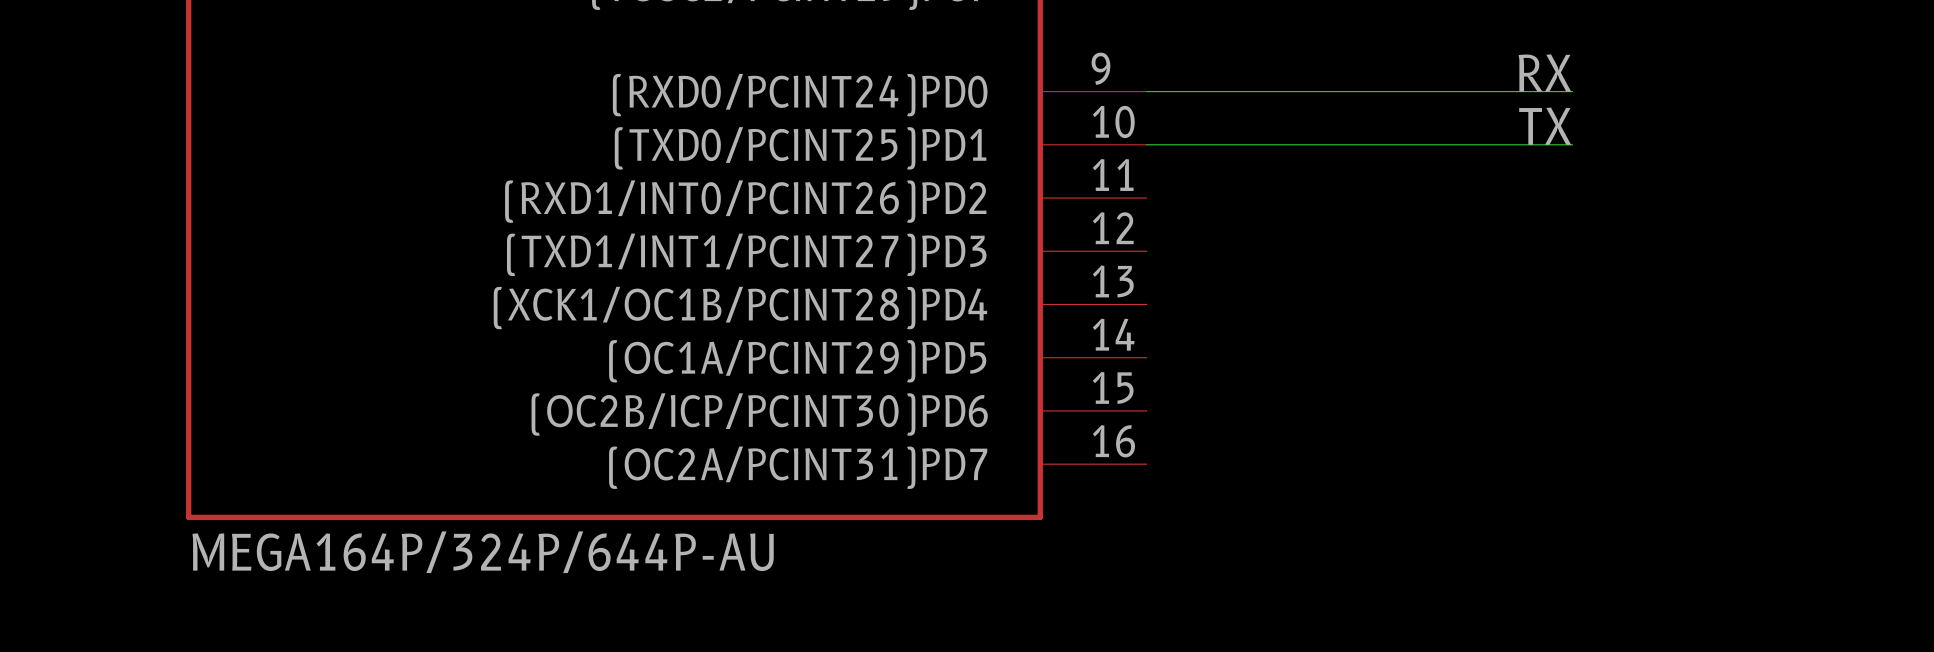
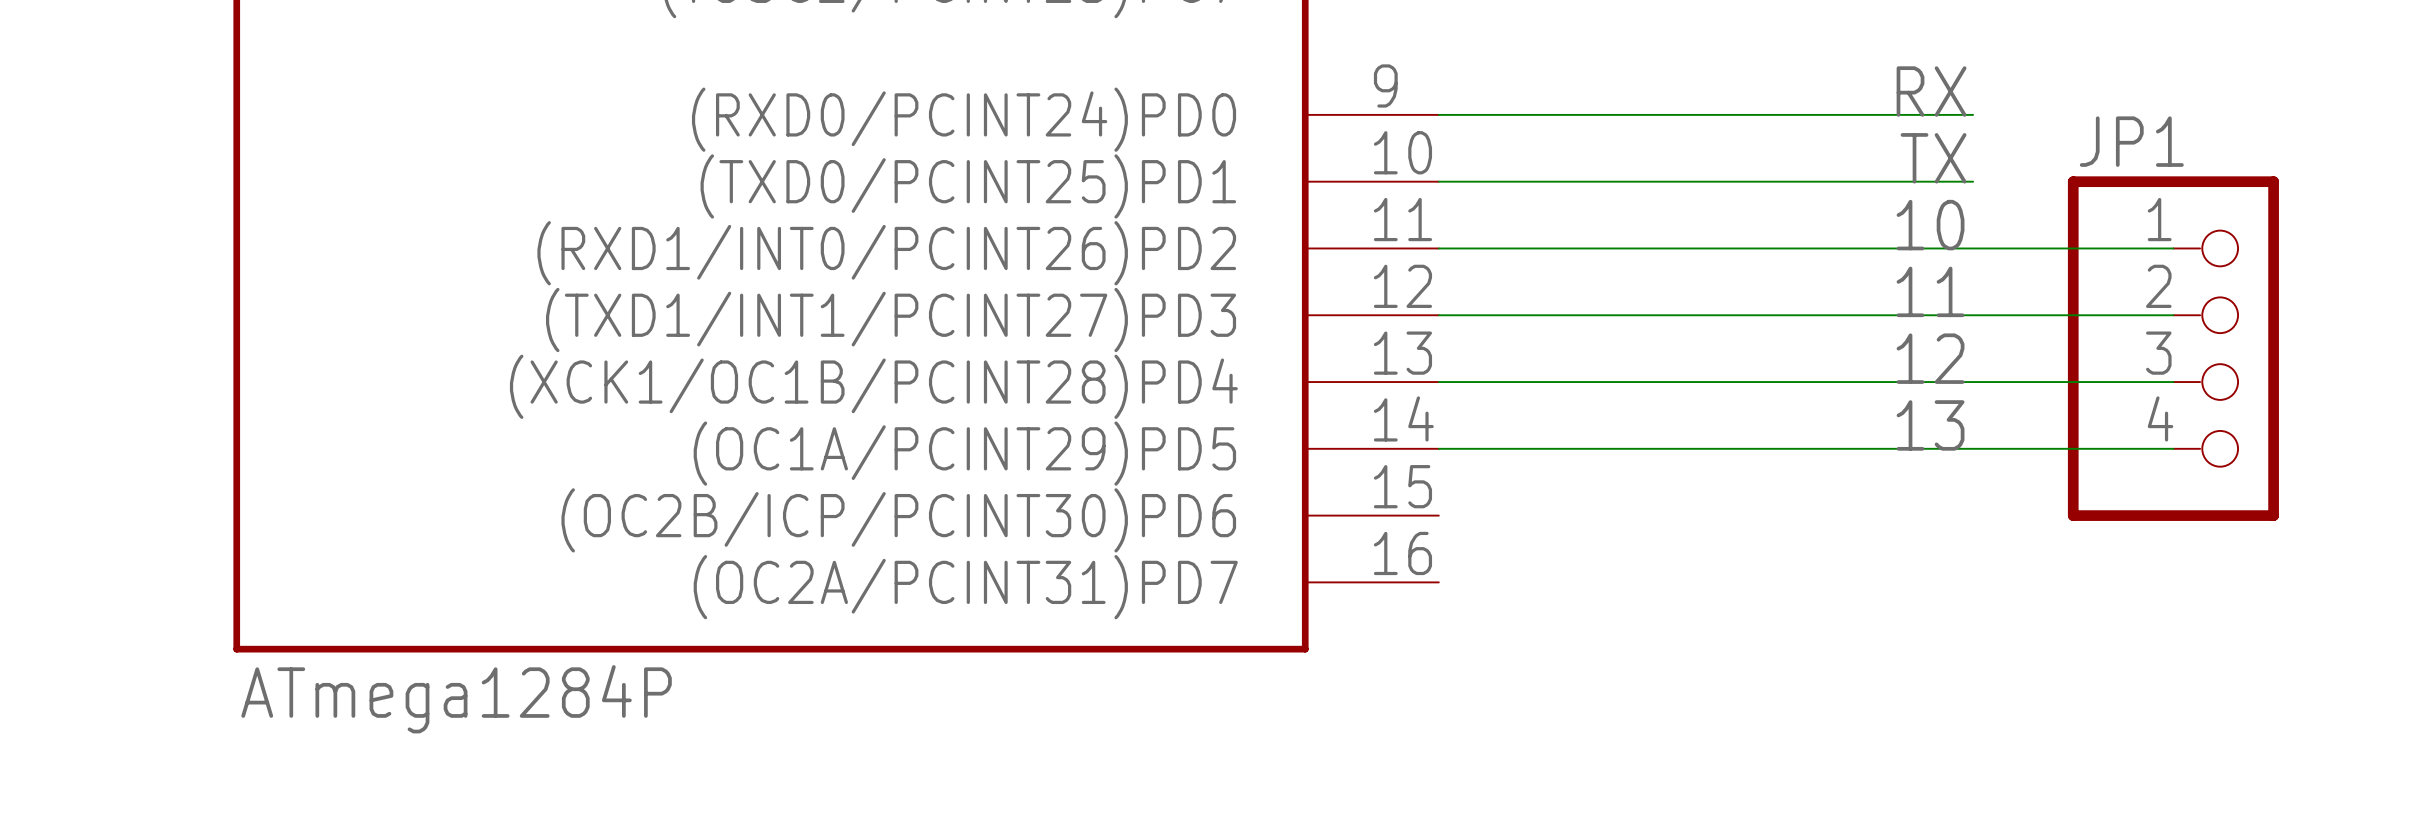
label: none -> 10 (1930, 225)
wire: none -> (1438, 248) (2173, 248)
label: none -> 11 (1930, 291)
wire: none -> (1438, 315) (2173, 315)
JP1: none -> (2173, 348)
label: none -> 12 (1930, 358)
wire: none -> (1438, 382) (2173, 382)
label: none -> 13 (1930, 425)
wire: none -> (1438, 448) (2173, 448)
part value: MEGA164P/324P/644P-AU (483, 552) -> ATmega1284P (456, 699)

